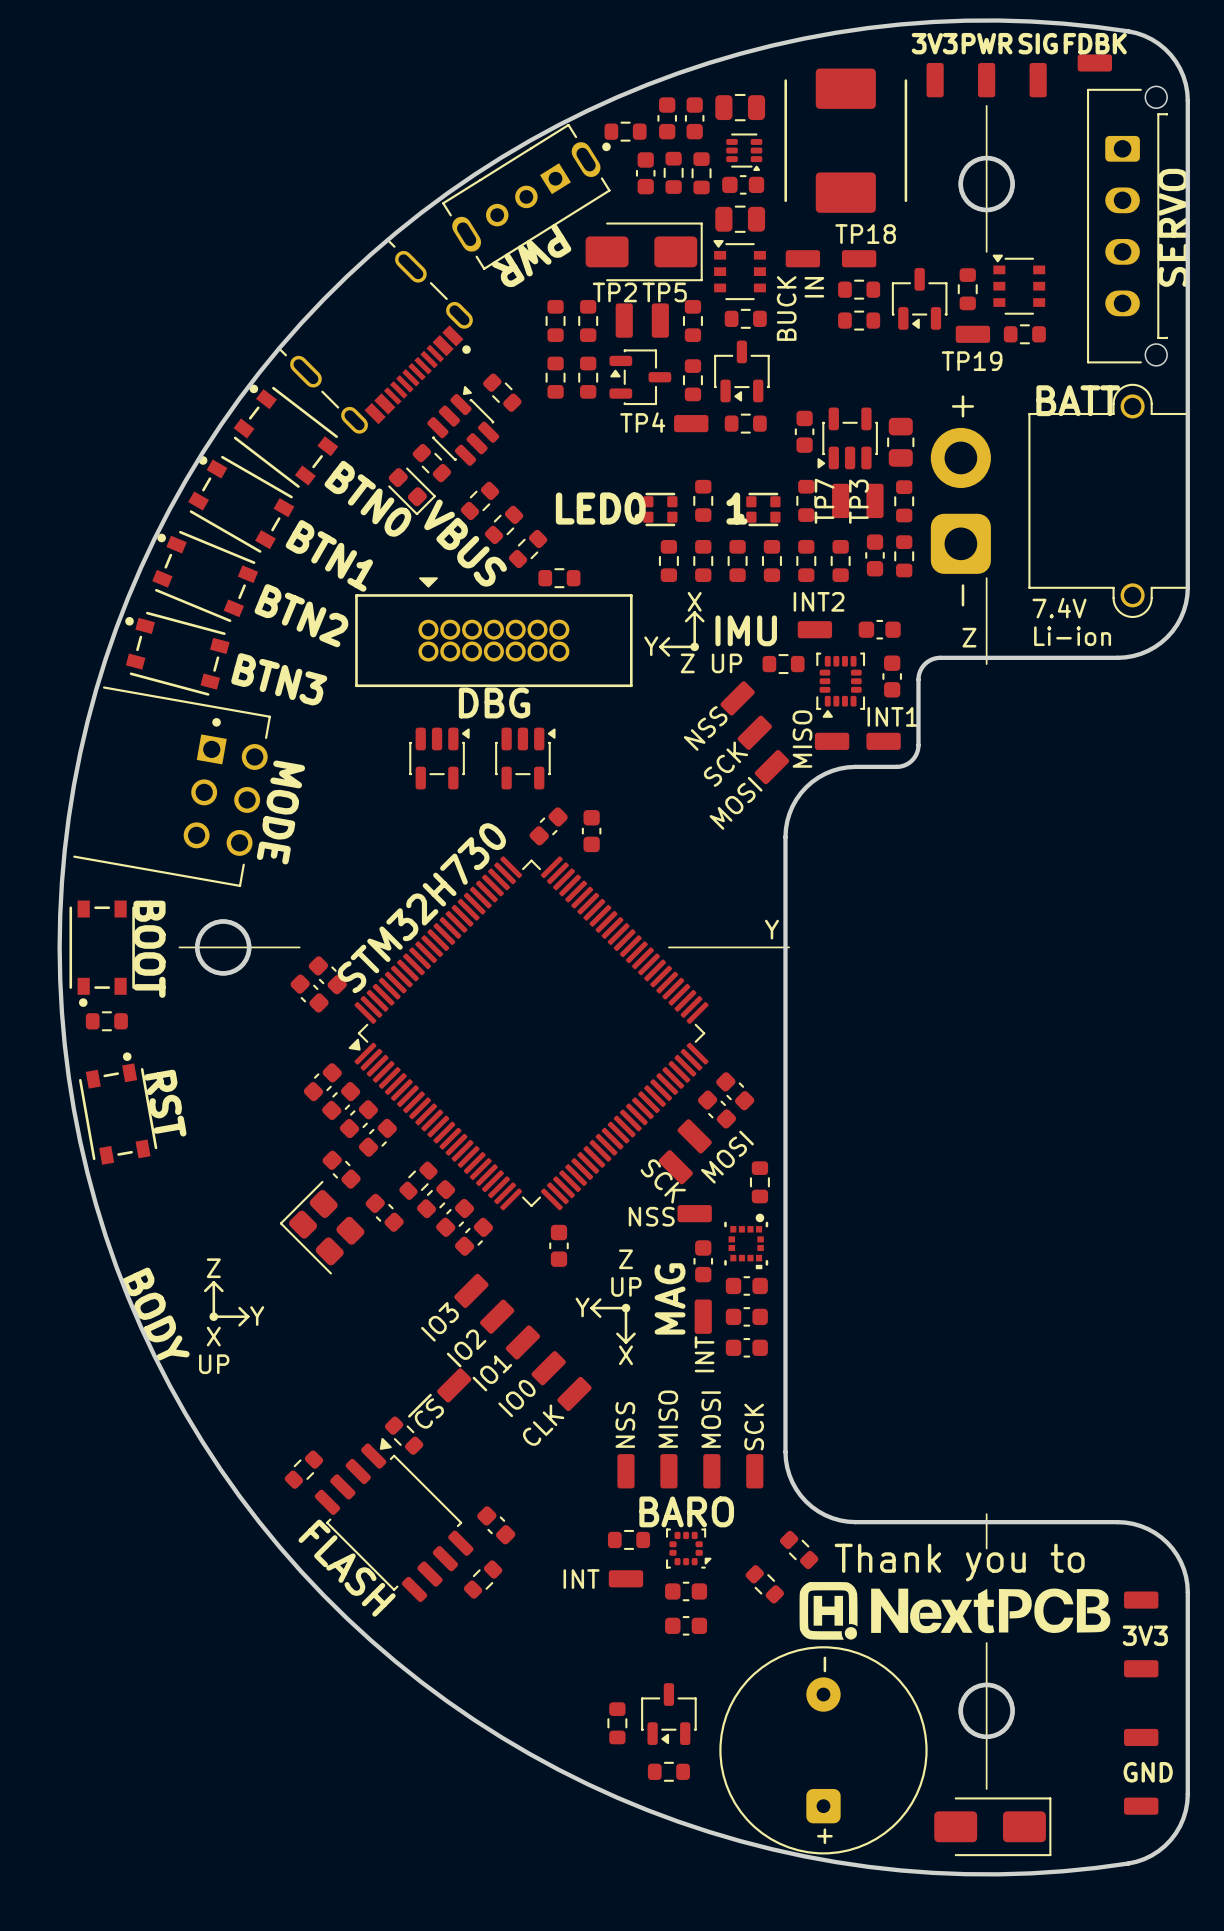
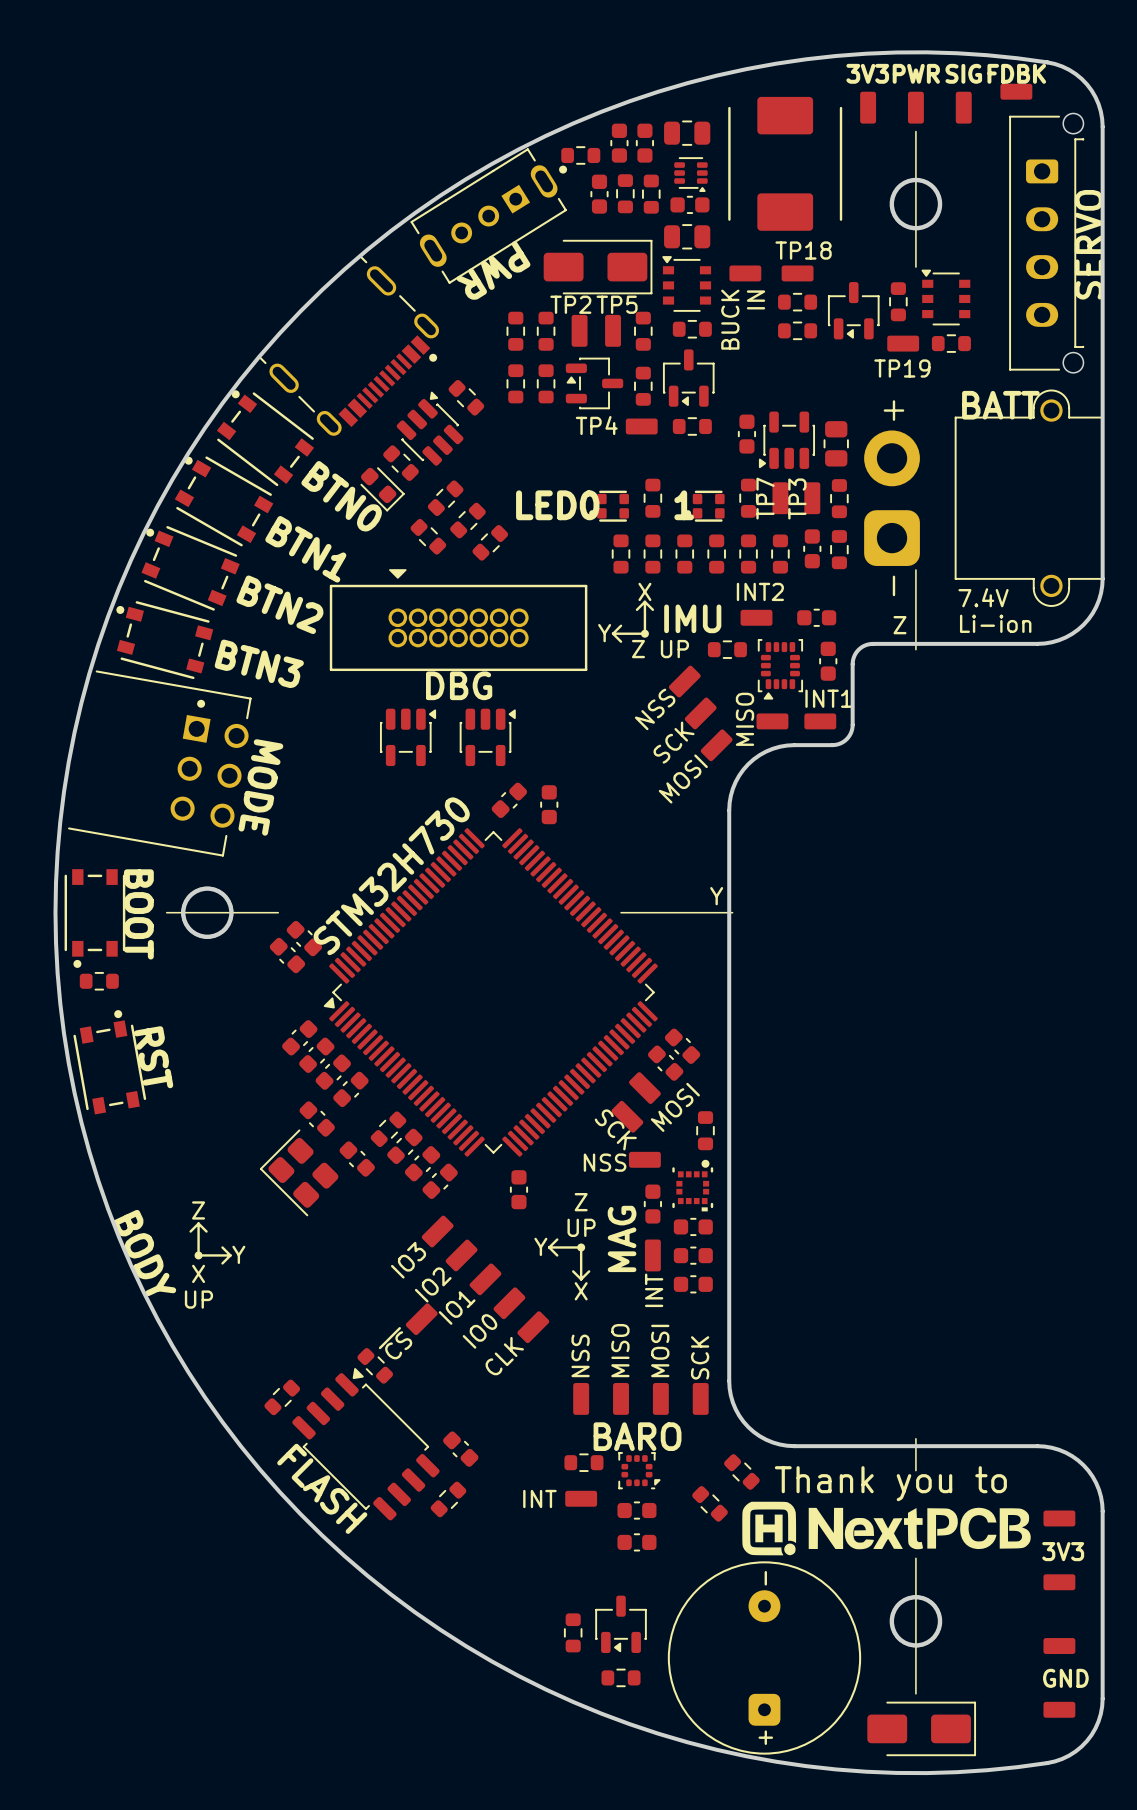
part: none -> (428, 536)
text: VBUS (465, 543) -> none
part: (559, 578) -> none

